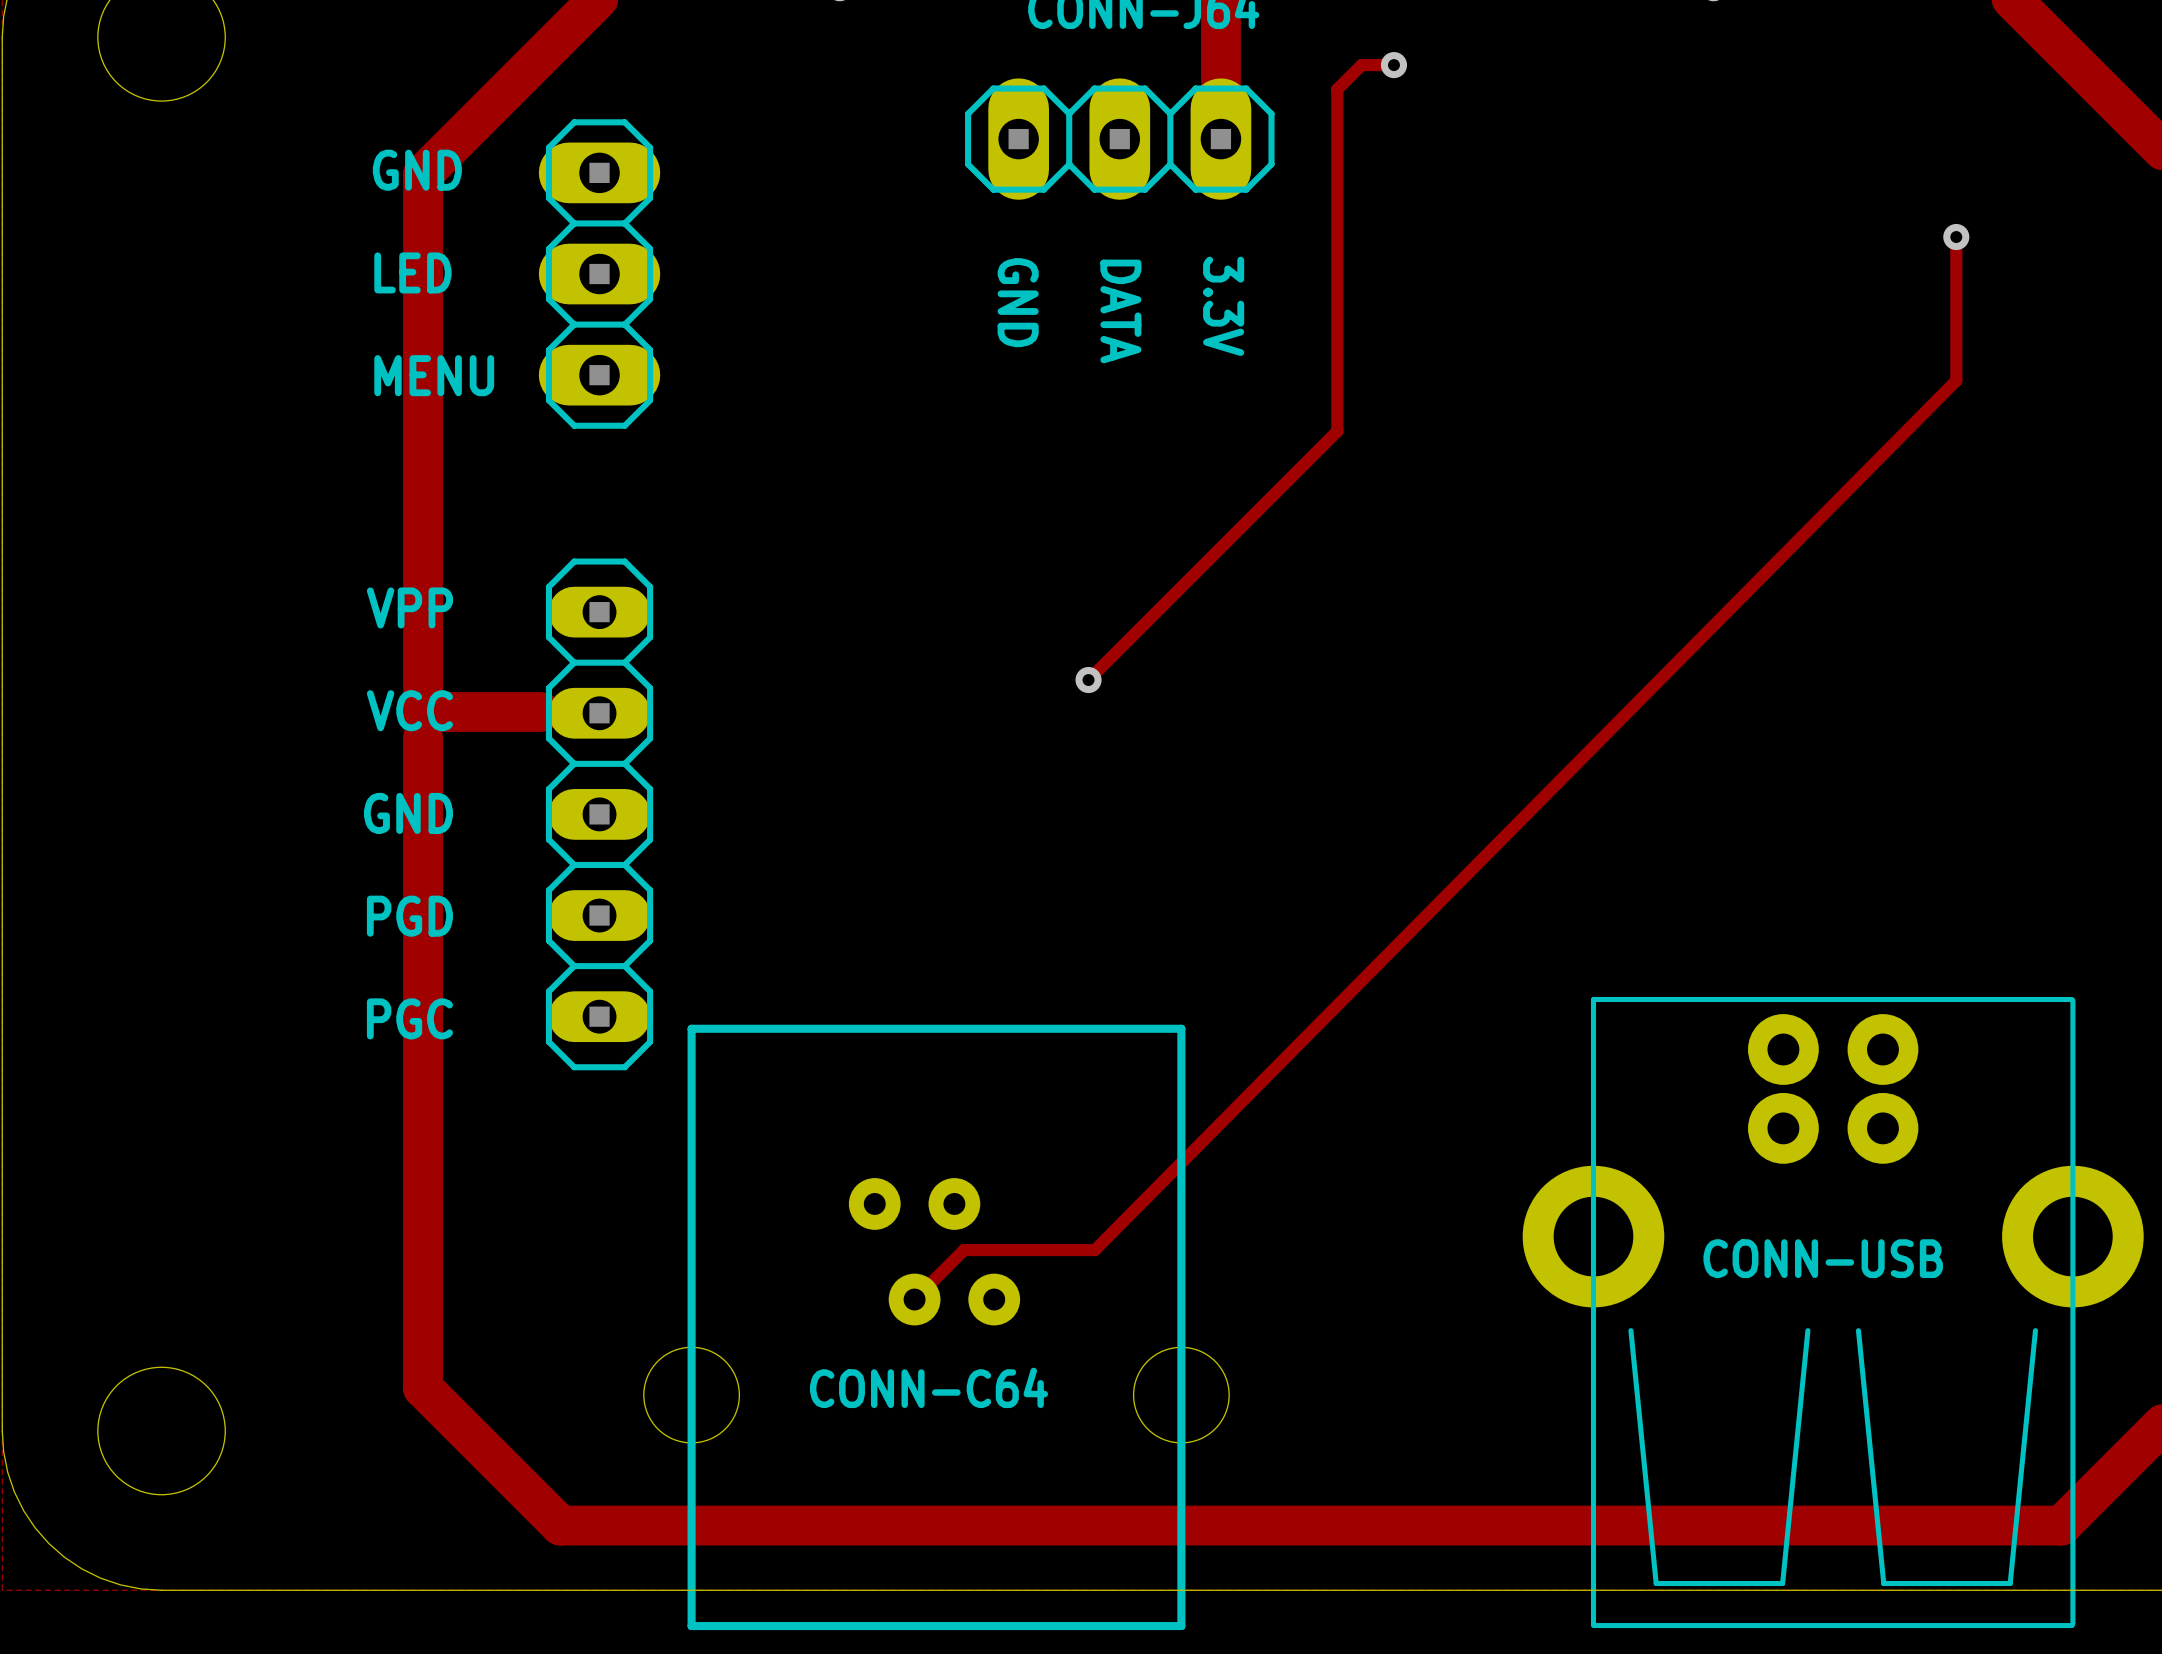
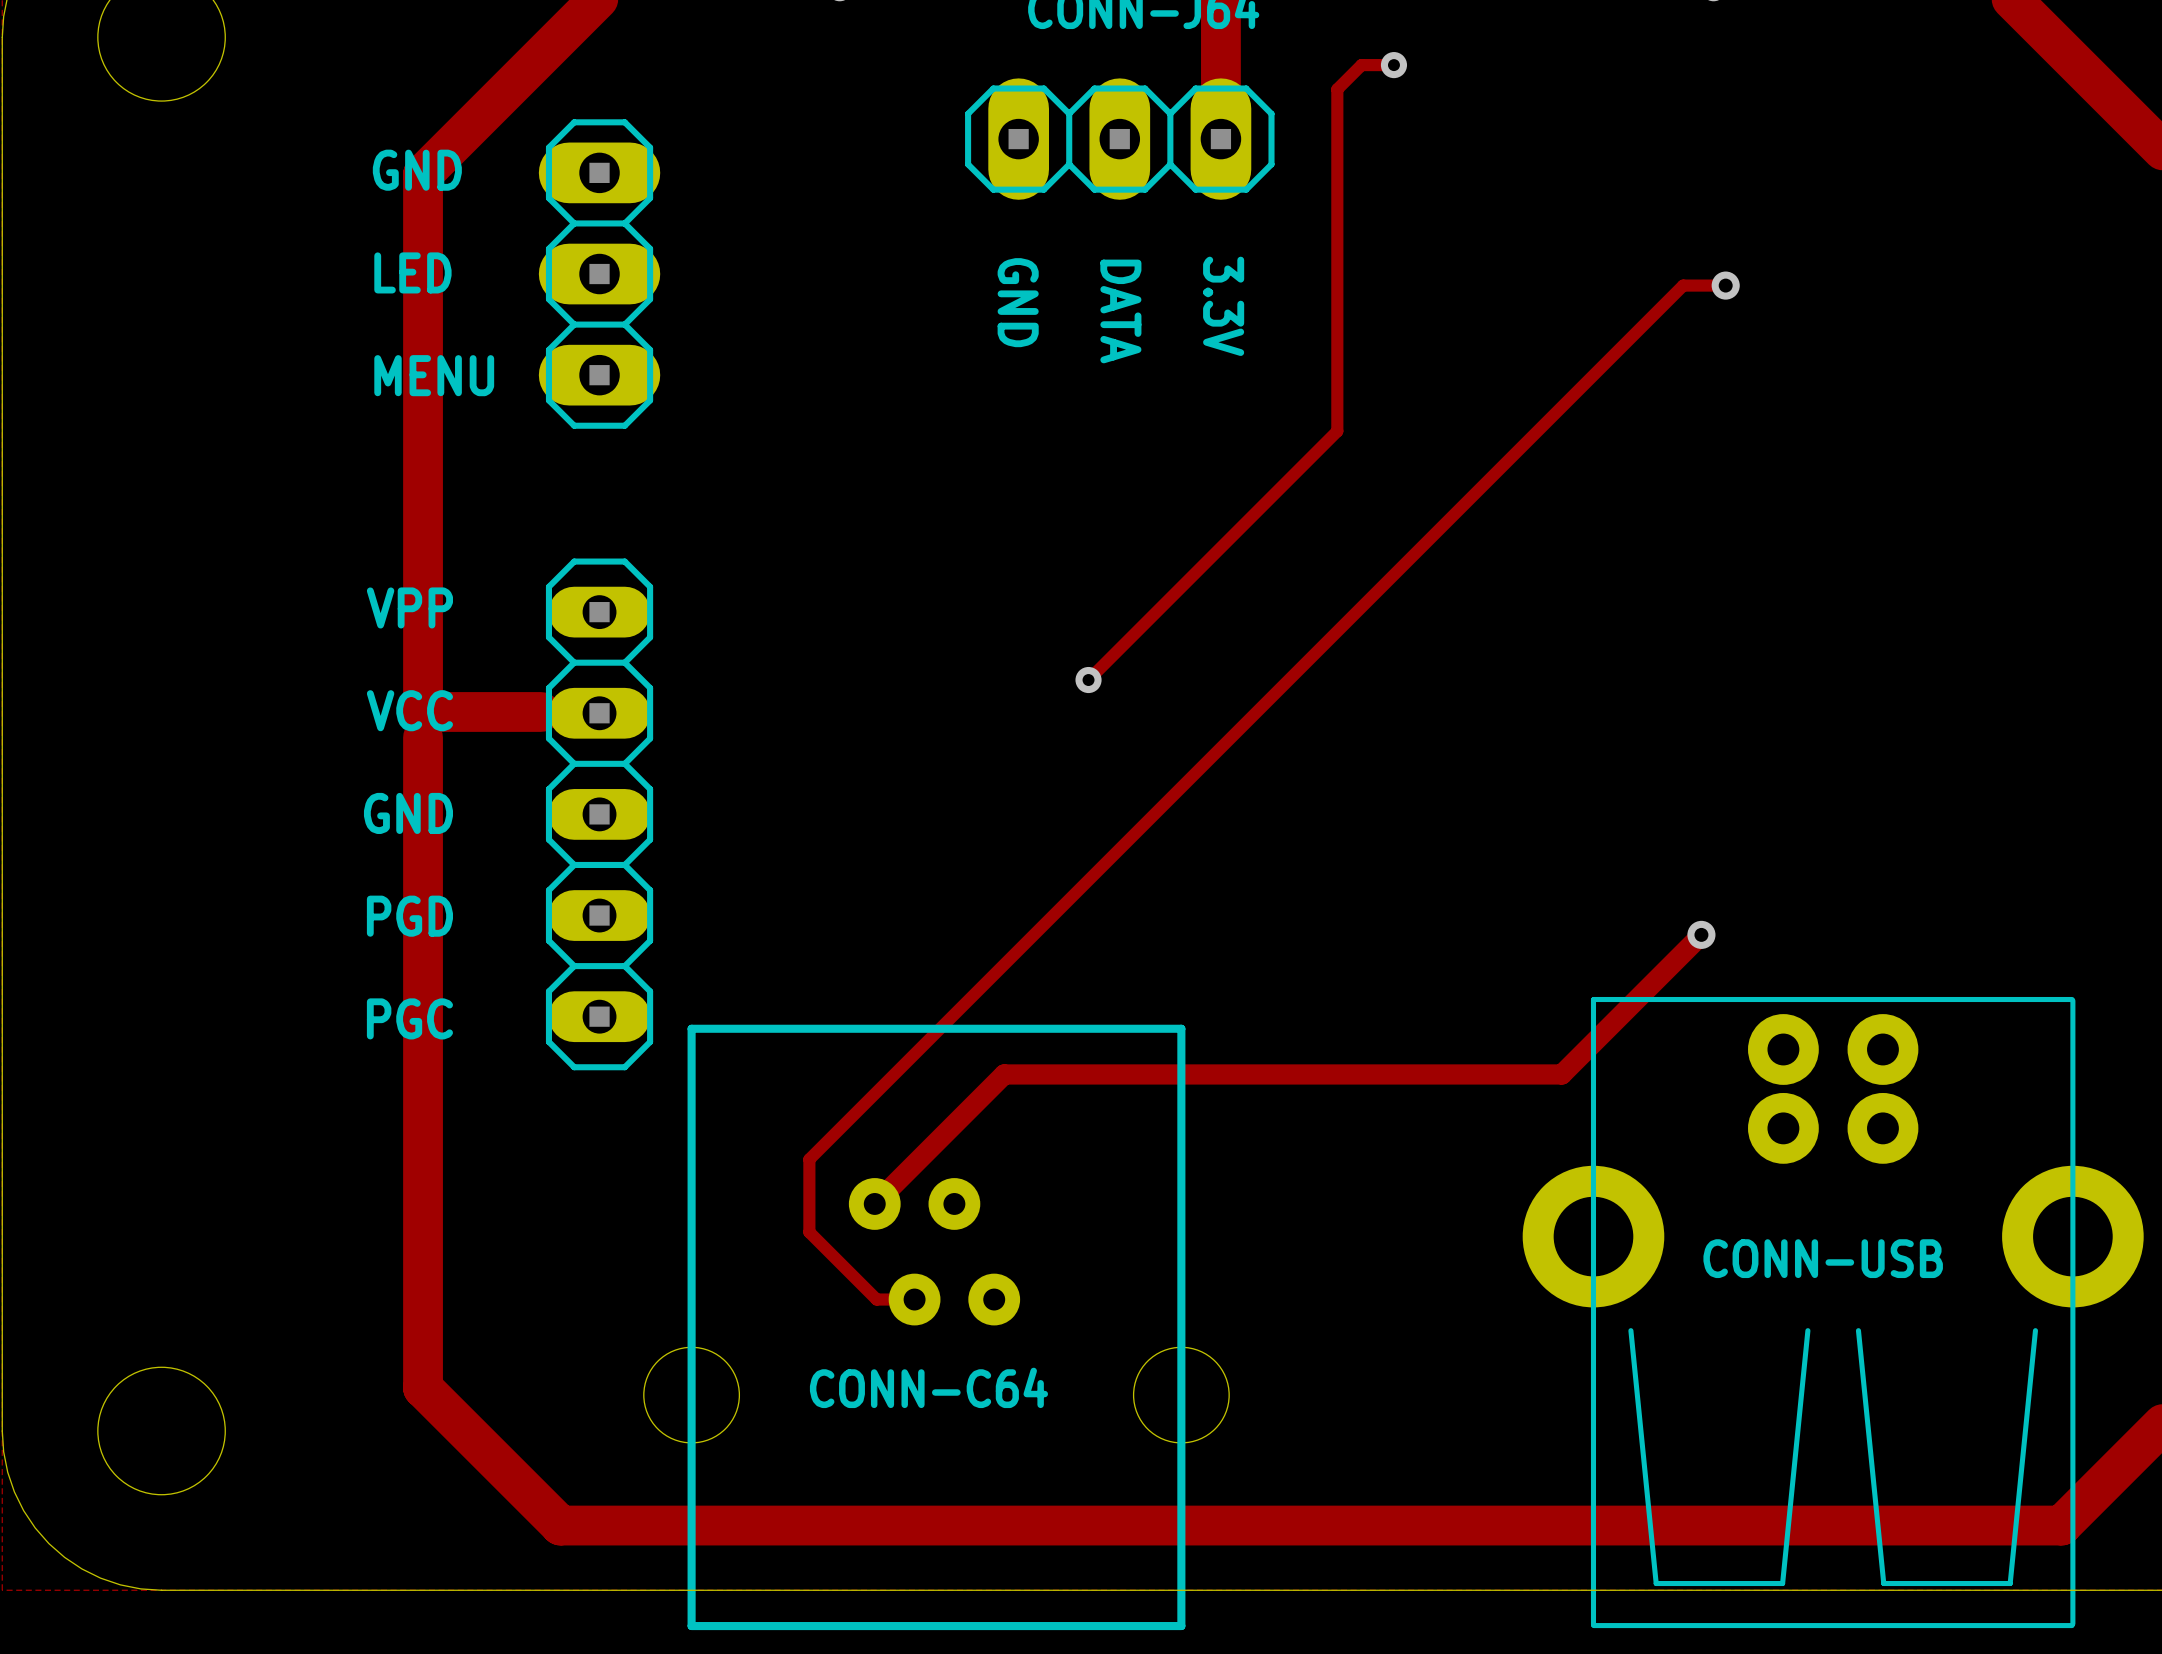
track: (1956, 237) (1956, 380) (1094, 1250) (964, 1250) (914, 1299) -> (1725, 285) (1683, 285) (809, 1159) (809, 1232) (876, 1299) (914, 1299)
via: (1956, 237) -> none
via: none -> (1725, 285)
track: none -> (1701, 934) (1561, 1074) (1004, 1074) (874, 1203)
via: none -> (1701, 934)

